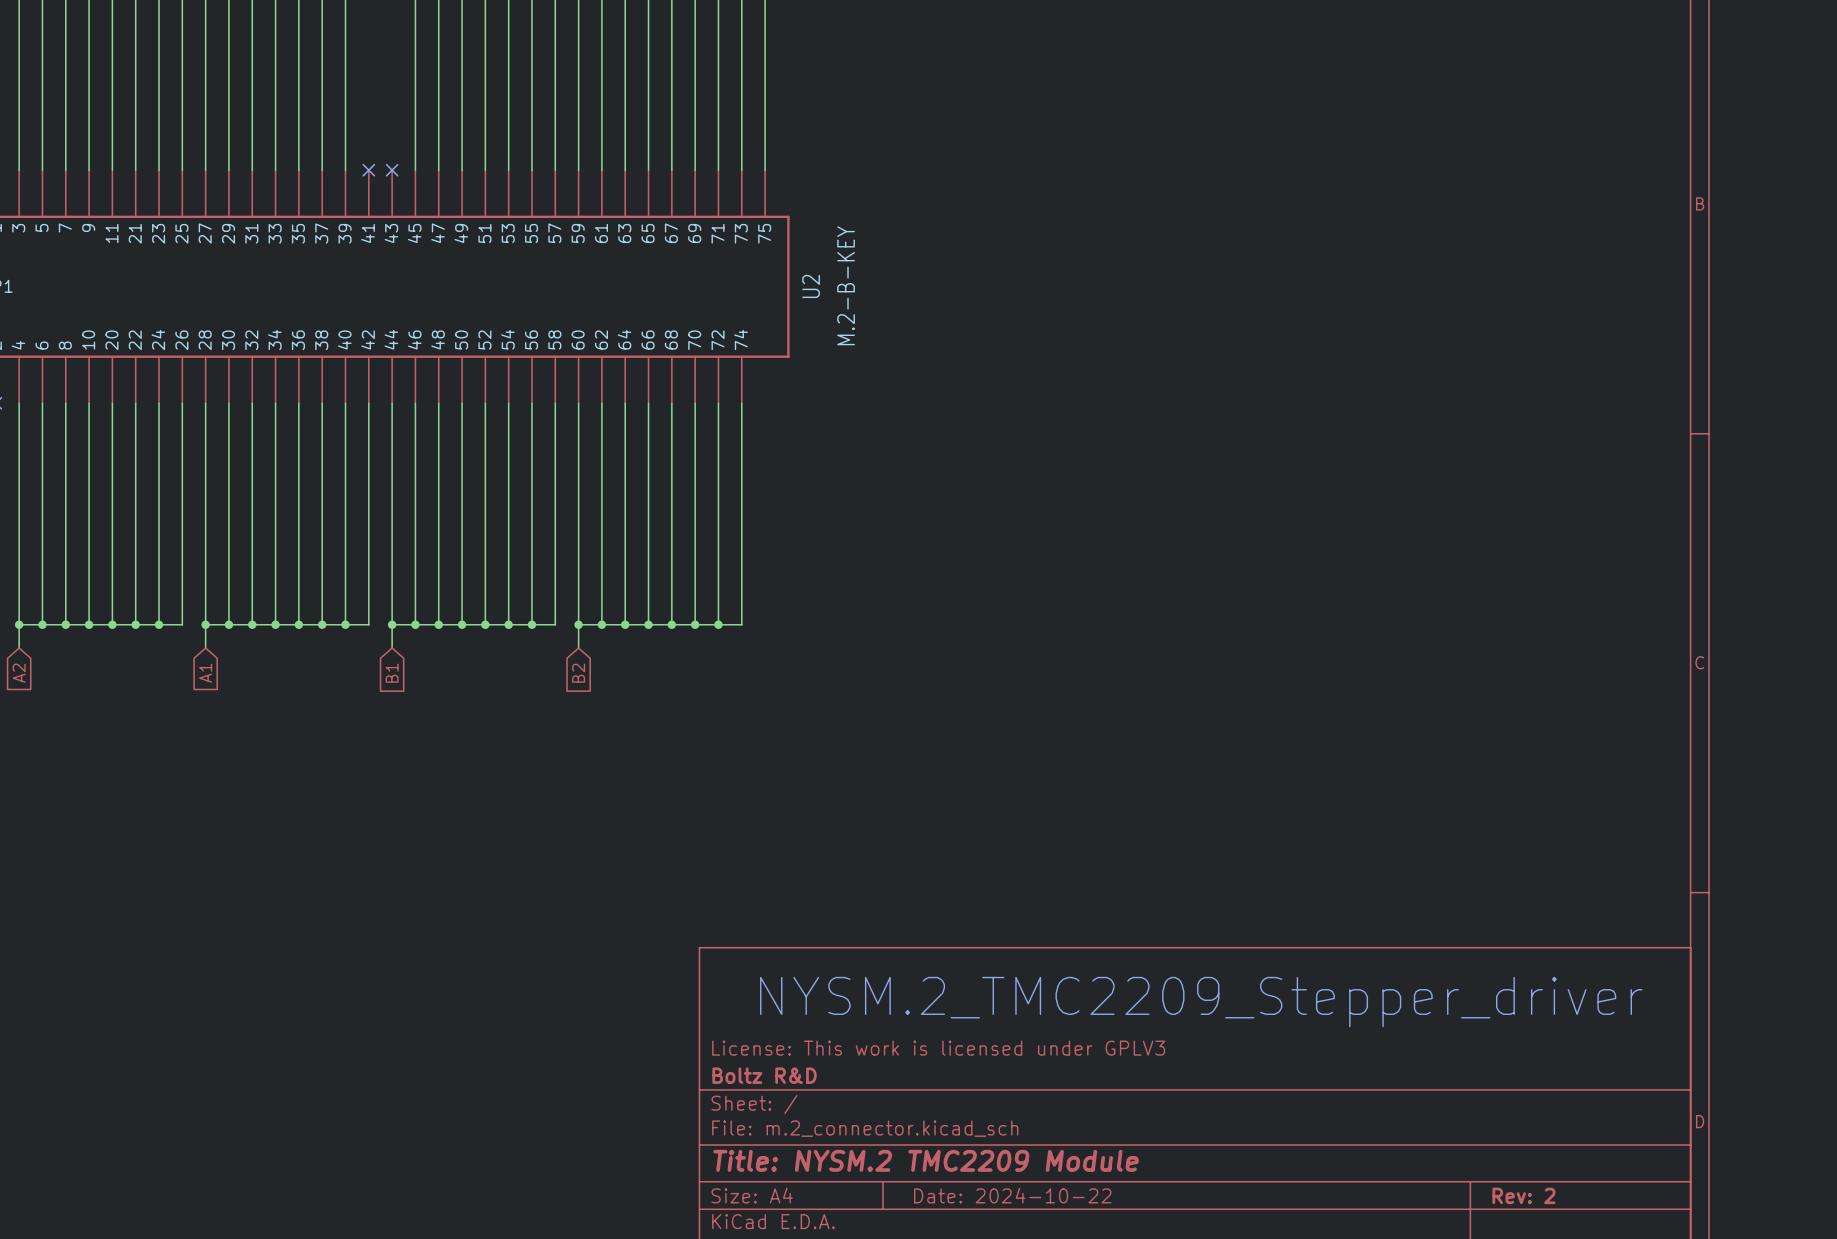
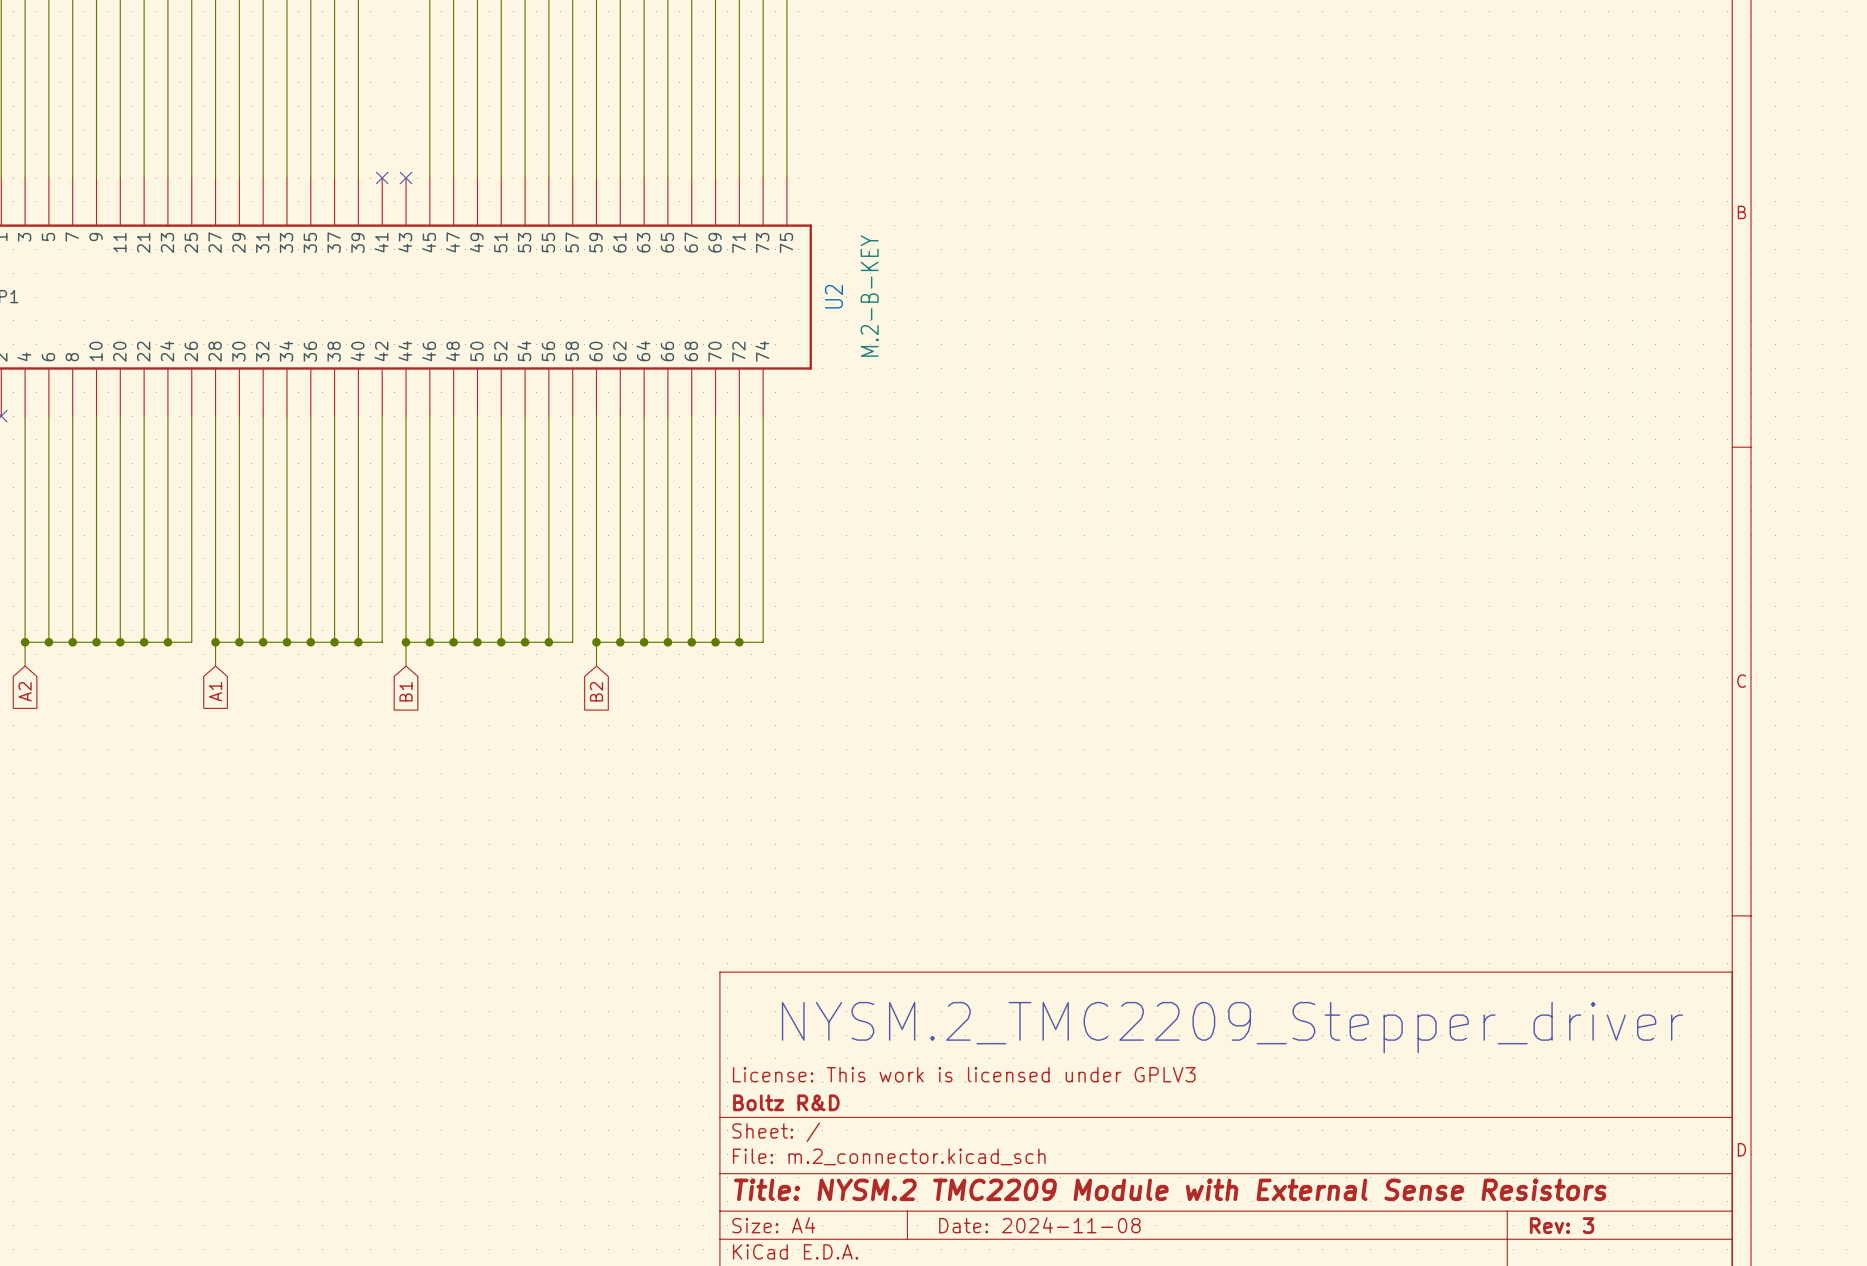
title block: Title: NYSM.2 TMC2209 Module (926, 1160) -> Title: NYSM.2 TMC2209 Module with External Sense Resistors (1170, 1189)
title block: Date: 2024-10-22 (1012, 1195) -> Date: 2024-11-08 (1039, 1225)
title block: Rev: 2 (1523, 1195) -> Rev: 3 (1562, 1225)

